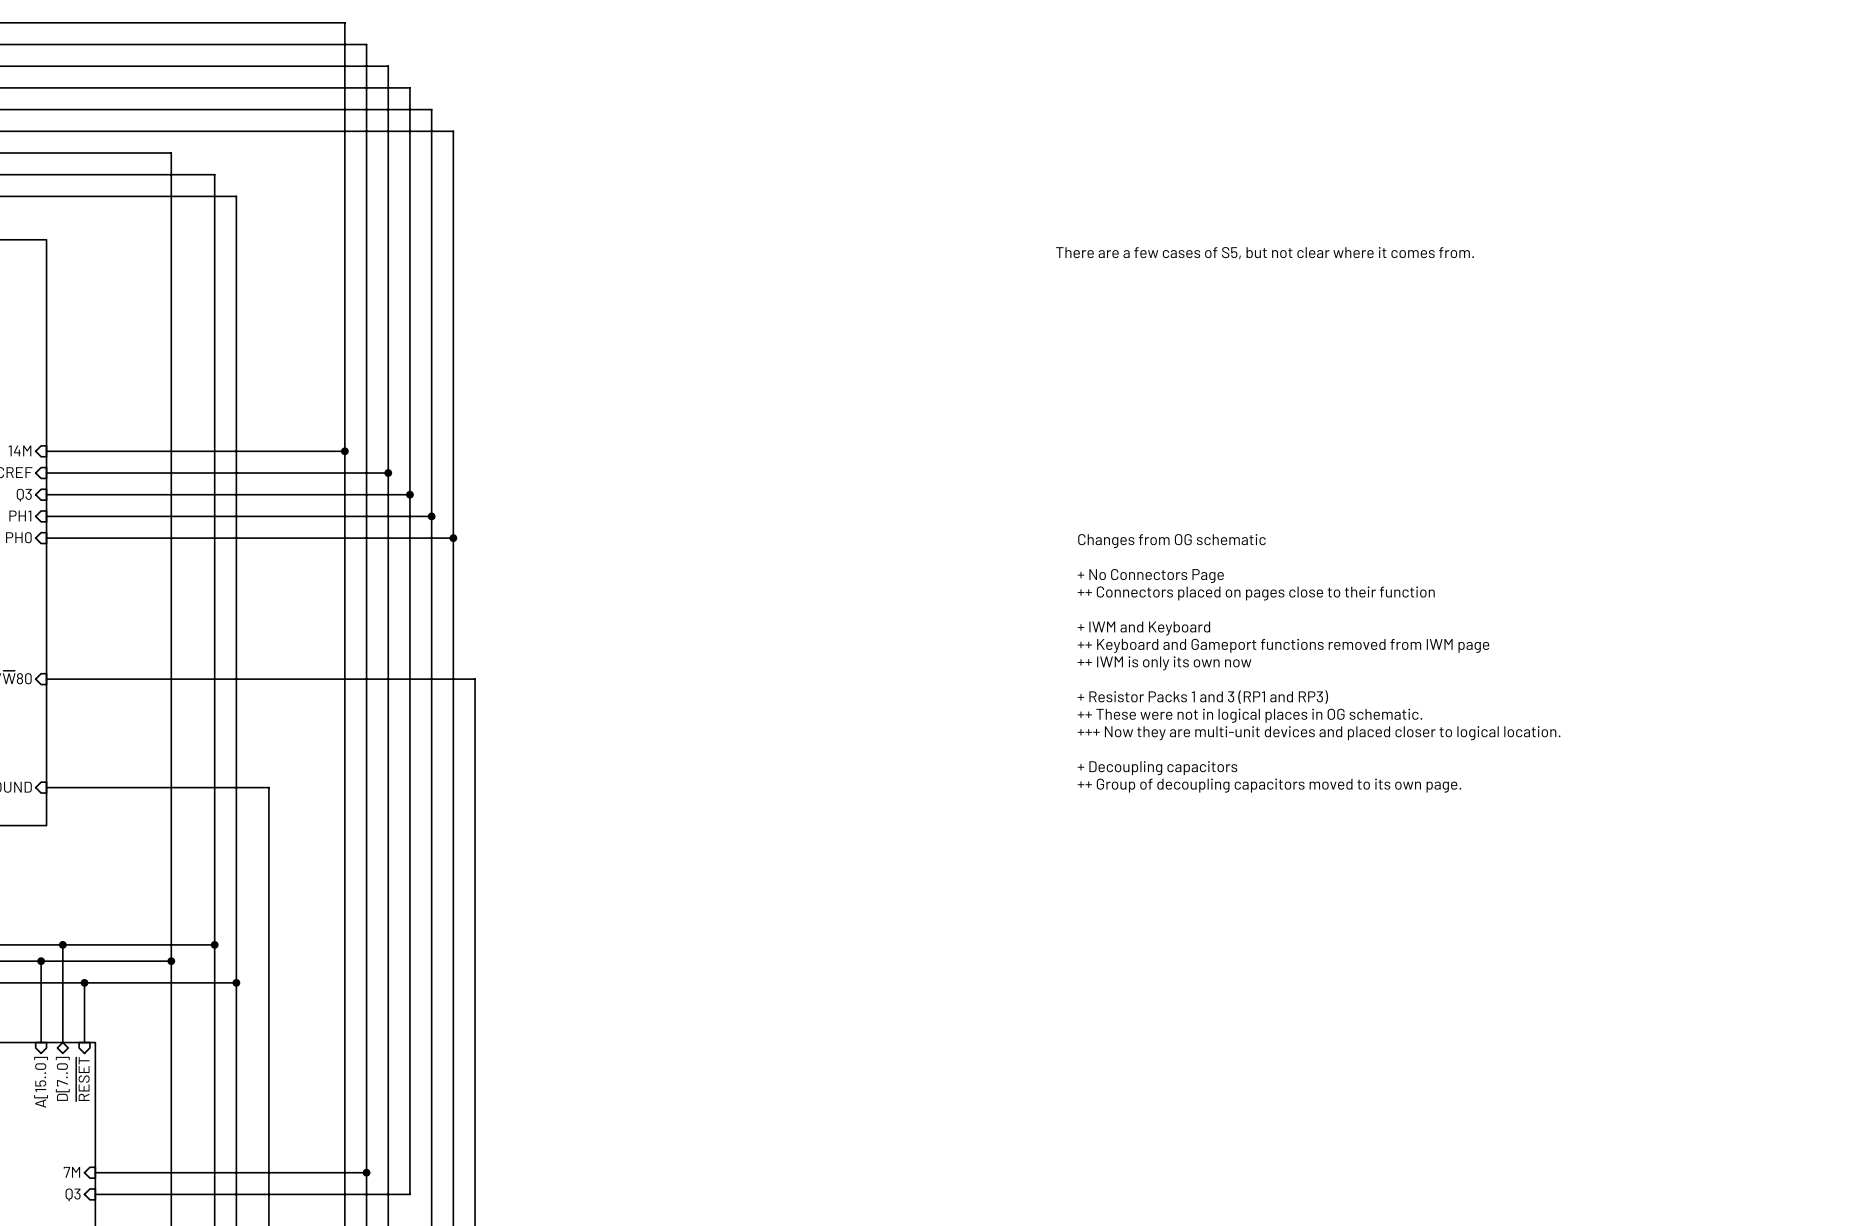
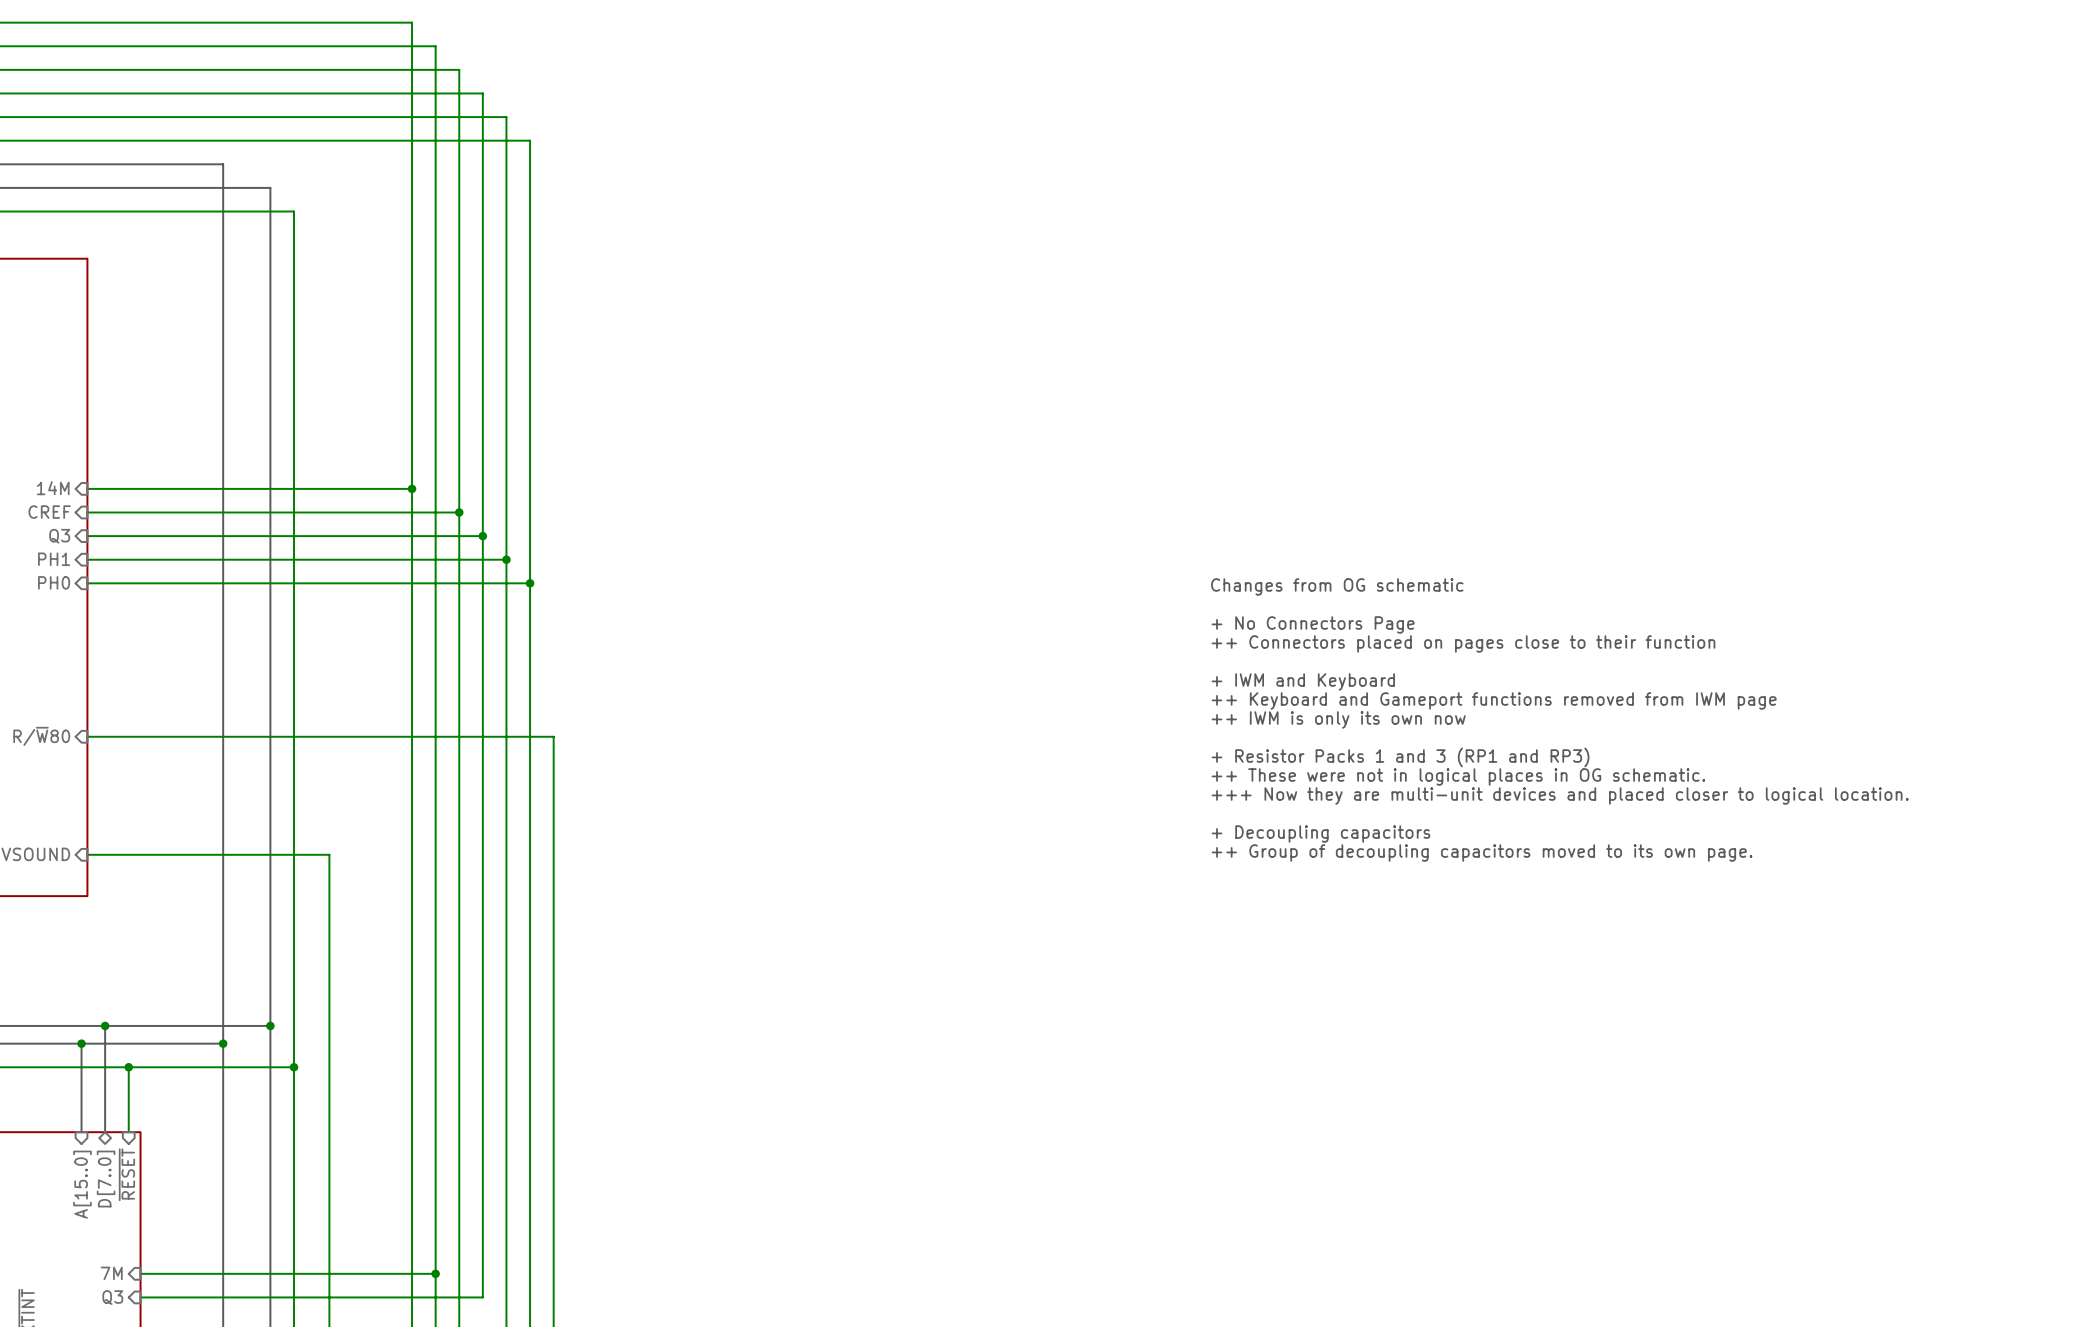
text: There are a few cases of S5, but not clear where it comes from. (1265, 253) -> none

